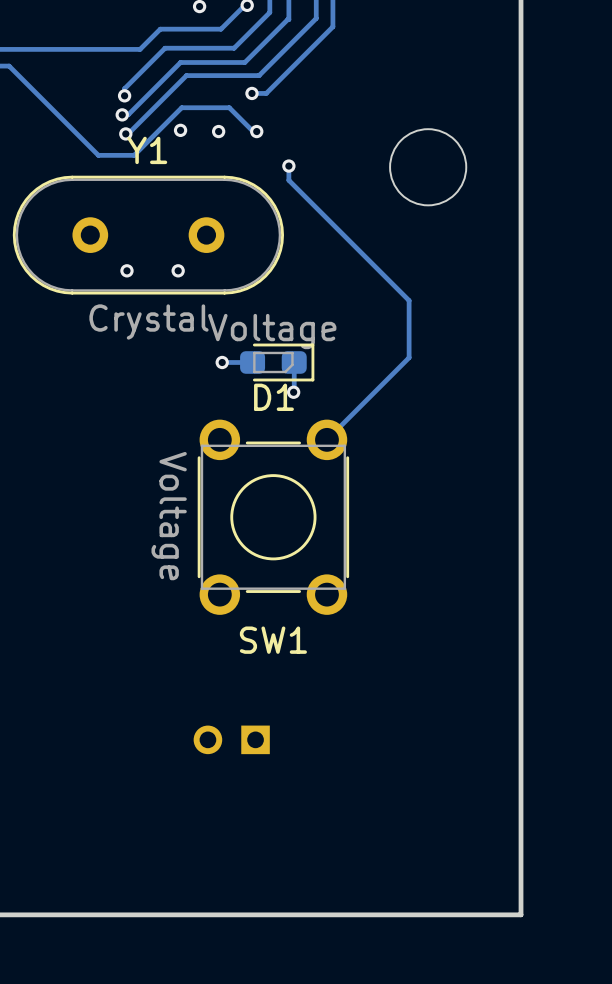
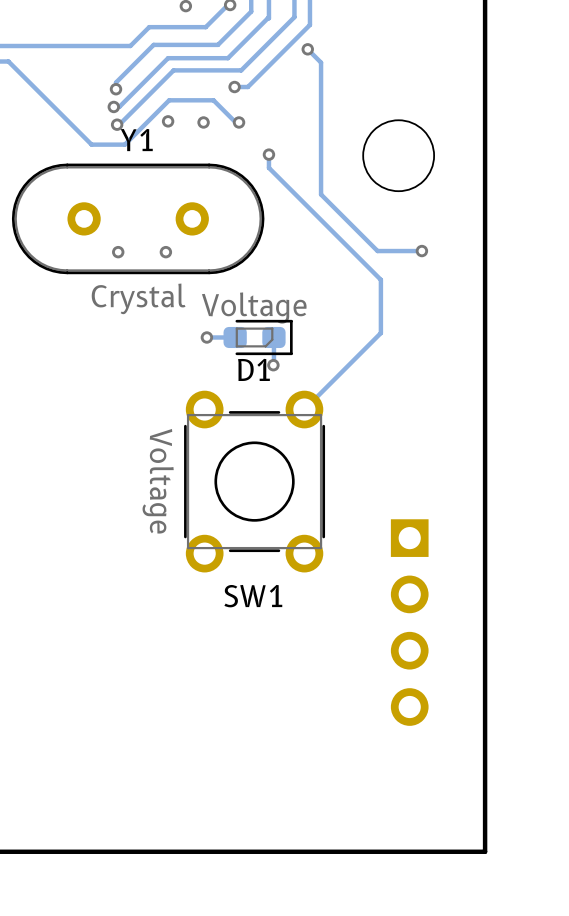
track: none -> (307, 49) (321, 62) (321, 194) (377, 251) (421, 251)
via: none -> (307, 49)
via: none -> (421, 251)
part: none -> (409, 622)
part: (231, 739) -> none

